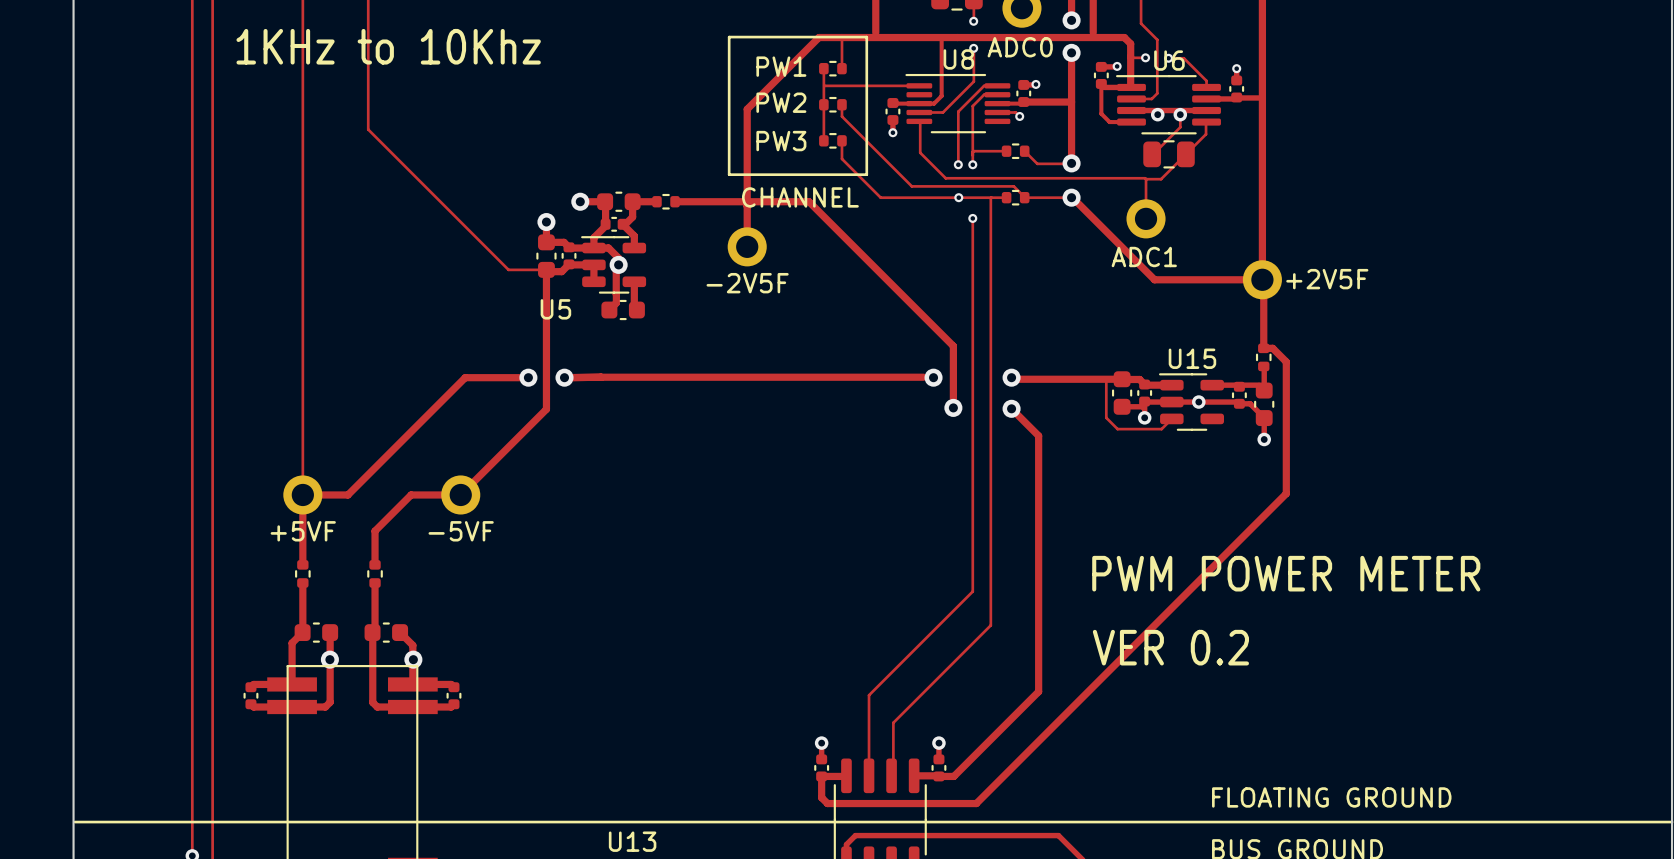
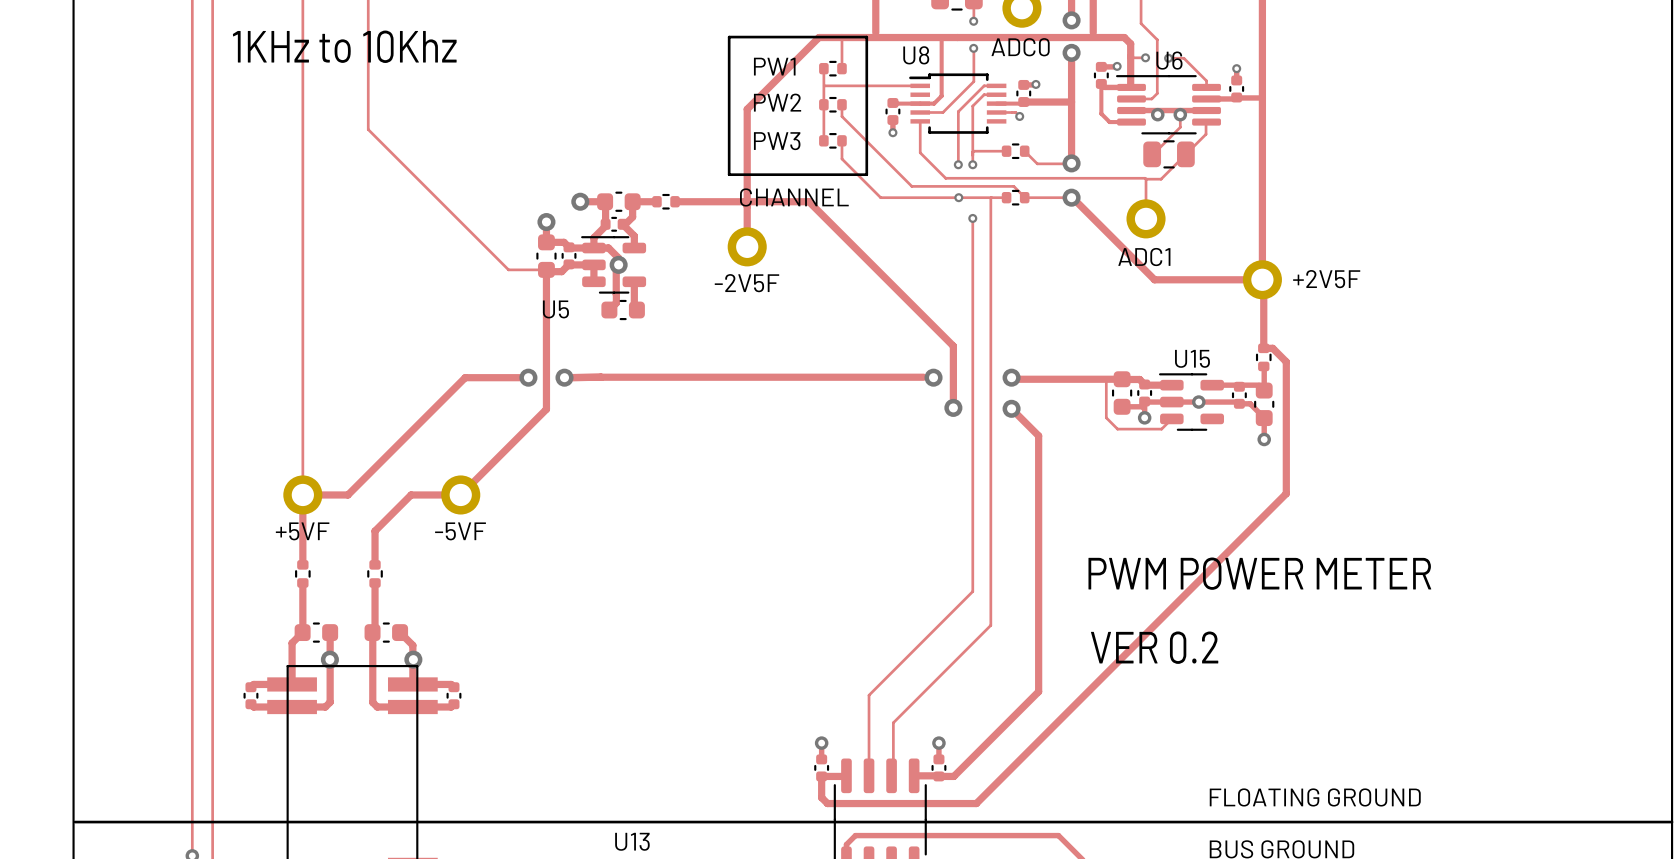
U8 name position: U8 (958, 59) -> U8 (916, 55)
U8 footprint: [905, 73, 1011, 134] -> [909, 73, 1007, 134]

